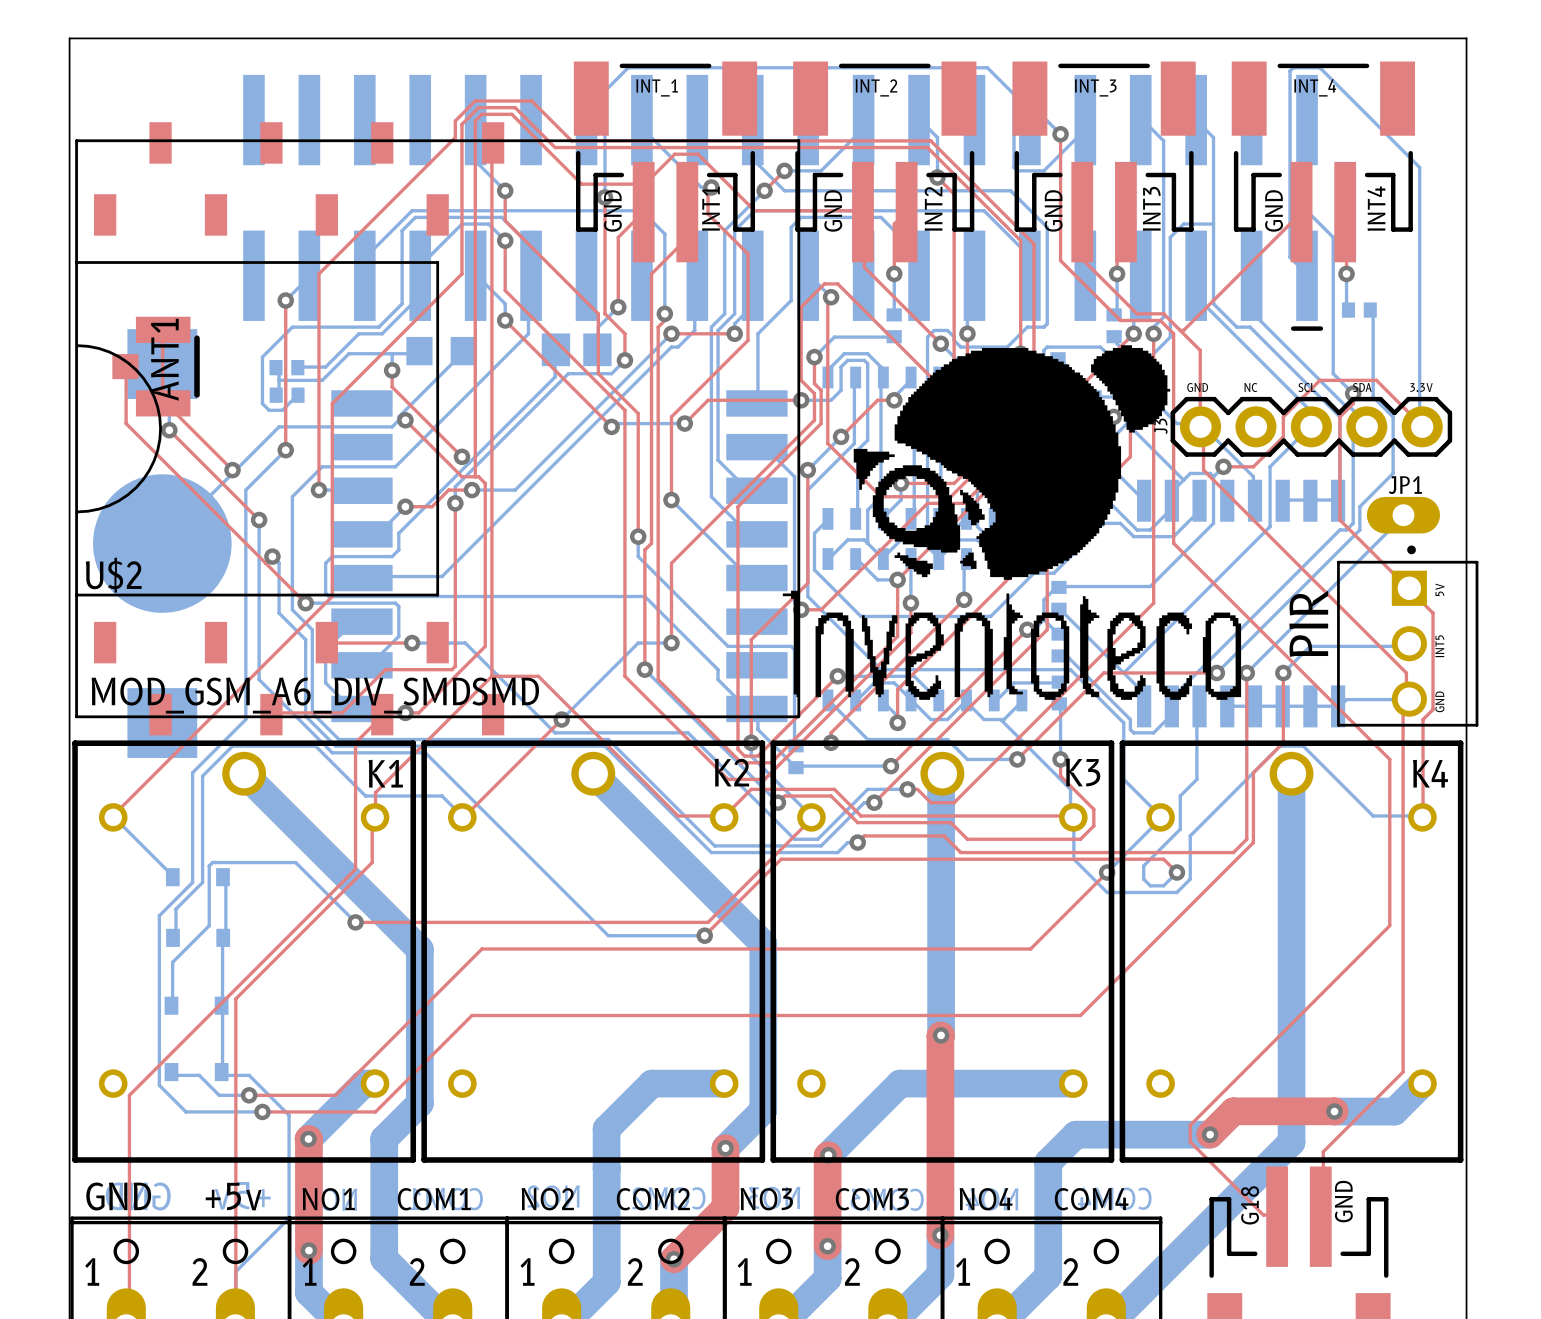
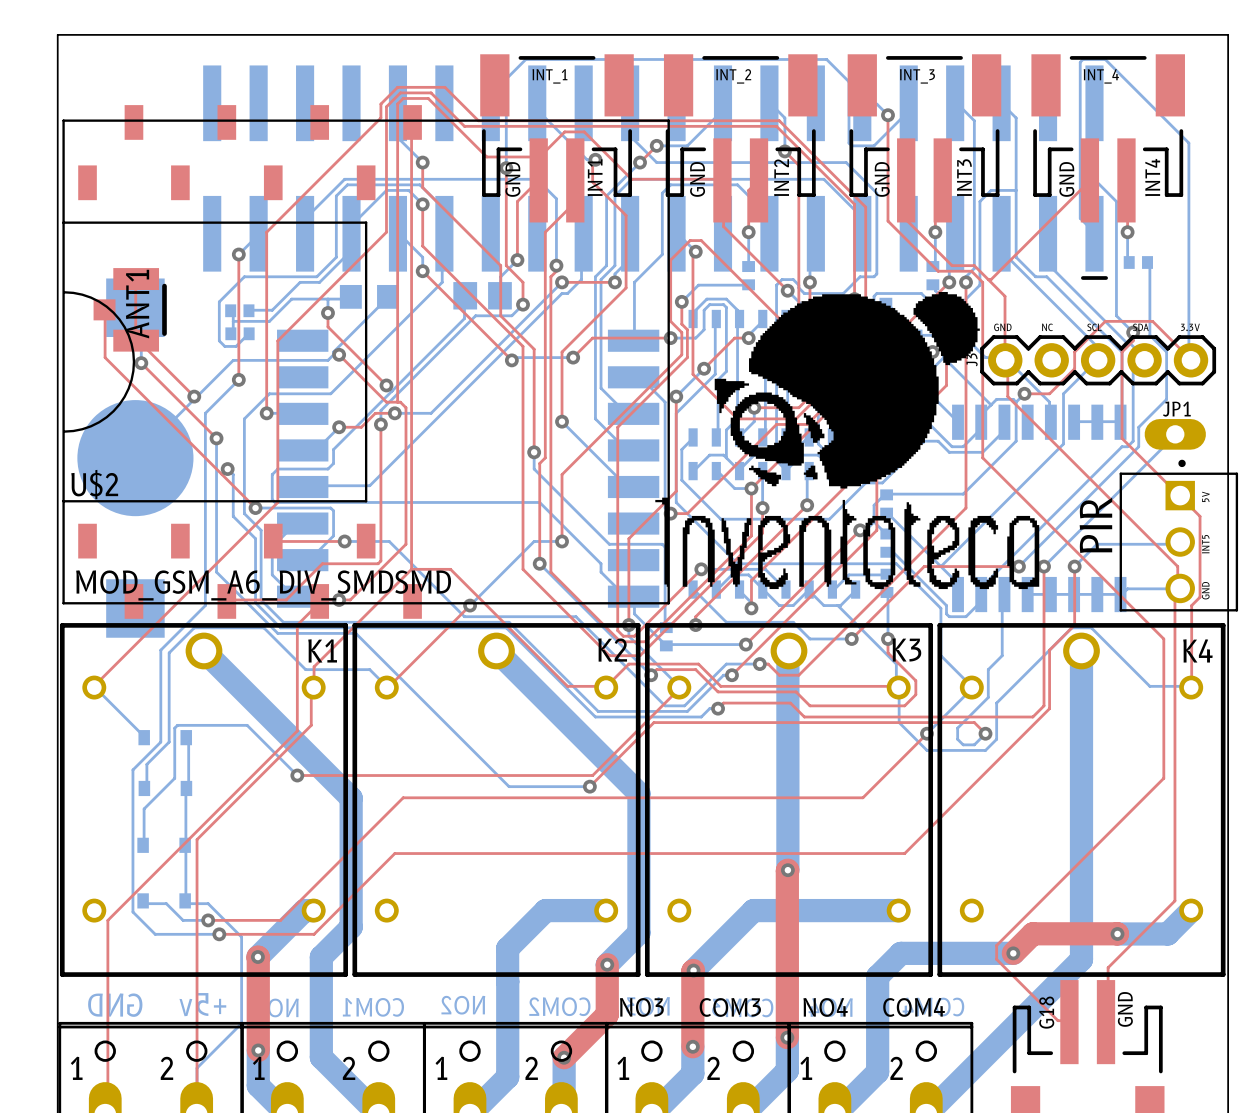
text: GND (118, 1196) -> none
text: +5v (233, 1196) -> none
text: NO1 (328, 1199) -> none
text: COM1 (434, 1199) -> none
text: NO2 (547, 1199) -> none
text: COM2 (653, 1199) -> none

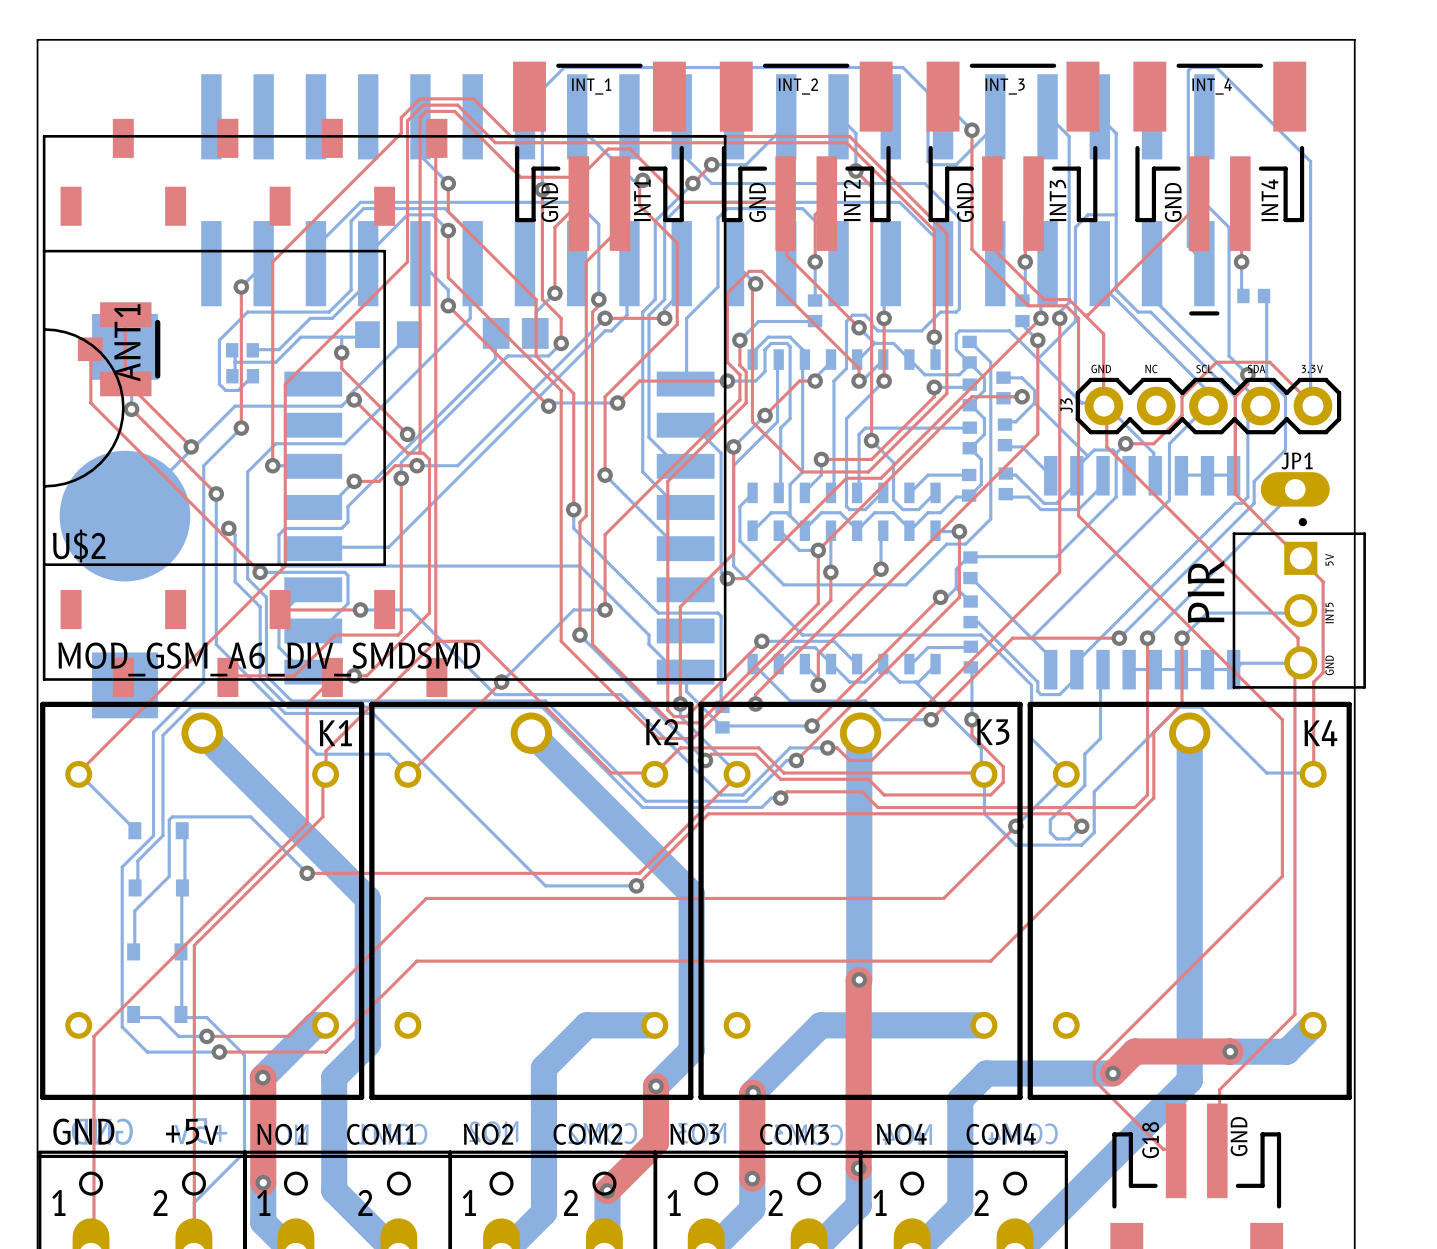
drawing: [655, 291, 1040, 590] -> none
text: none -> GND (83, 1131)
text: none -> +5v (192, 1131)
text: none -> NO1 (281, 1134)
text: none -> COM1 (381, 1134)
text: none -> NO2 (488, 1134)
text: none -> COM2 (587, 1134)

